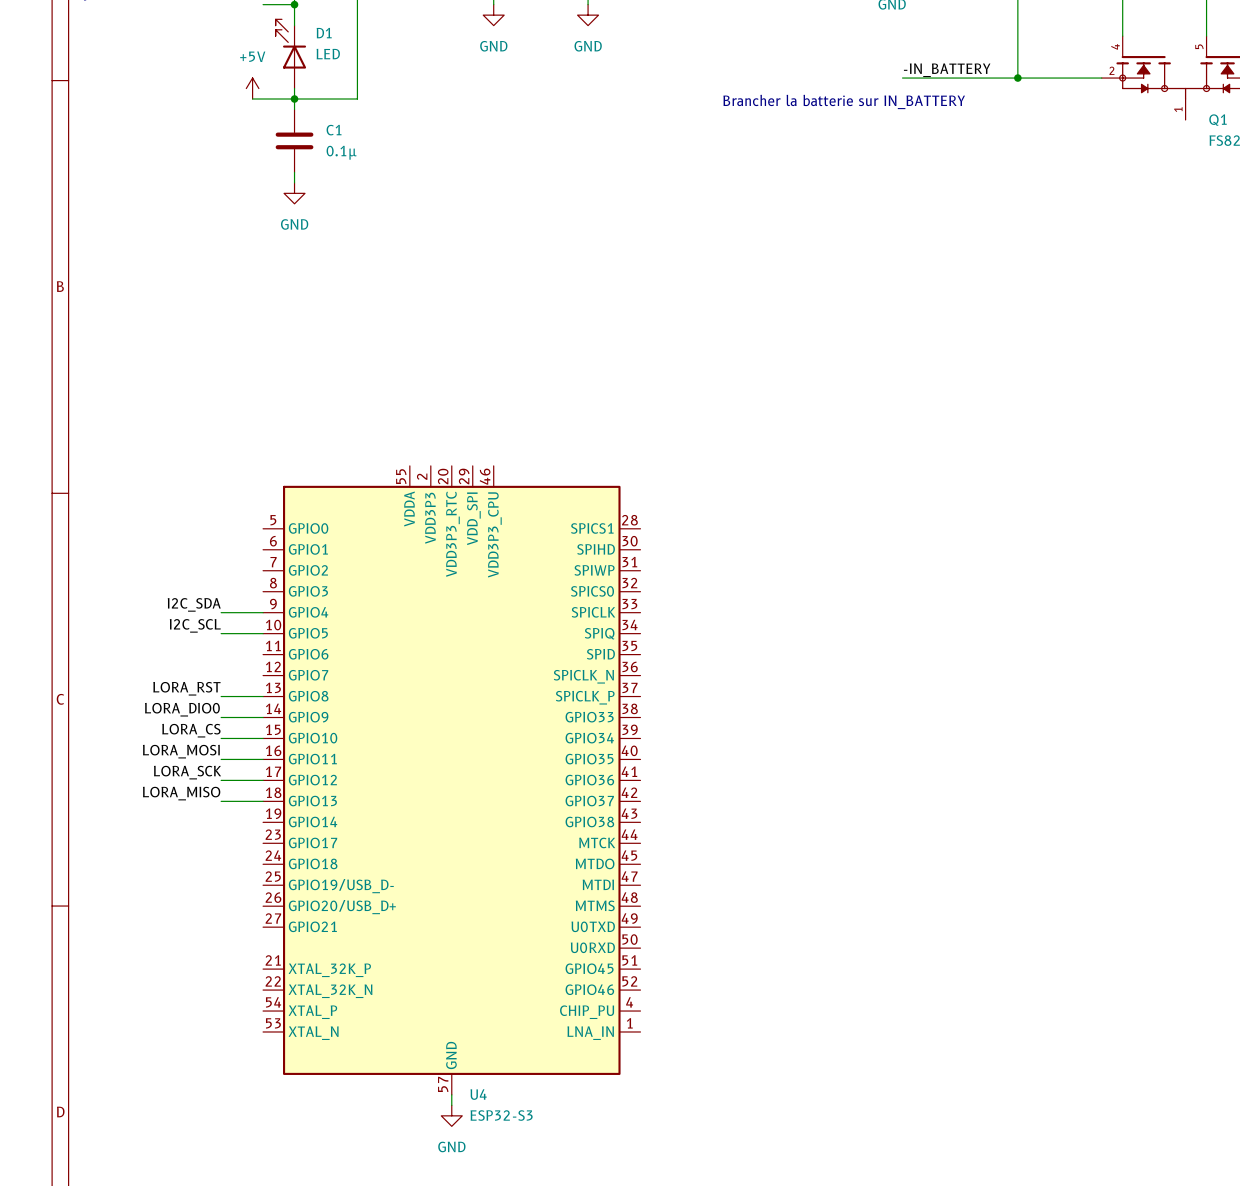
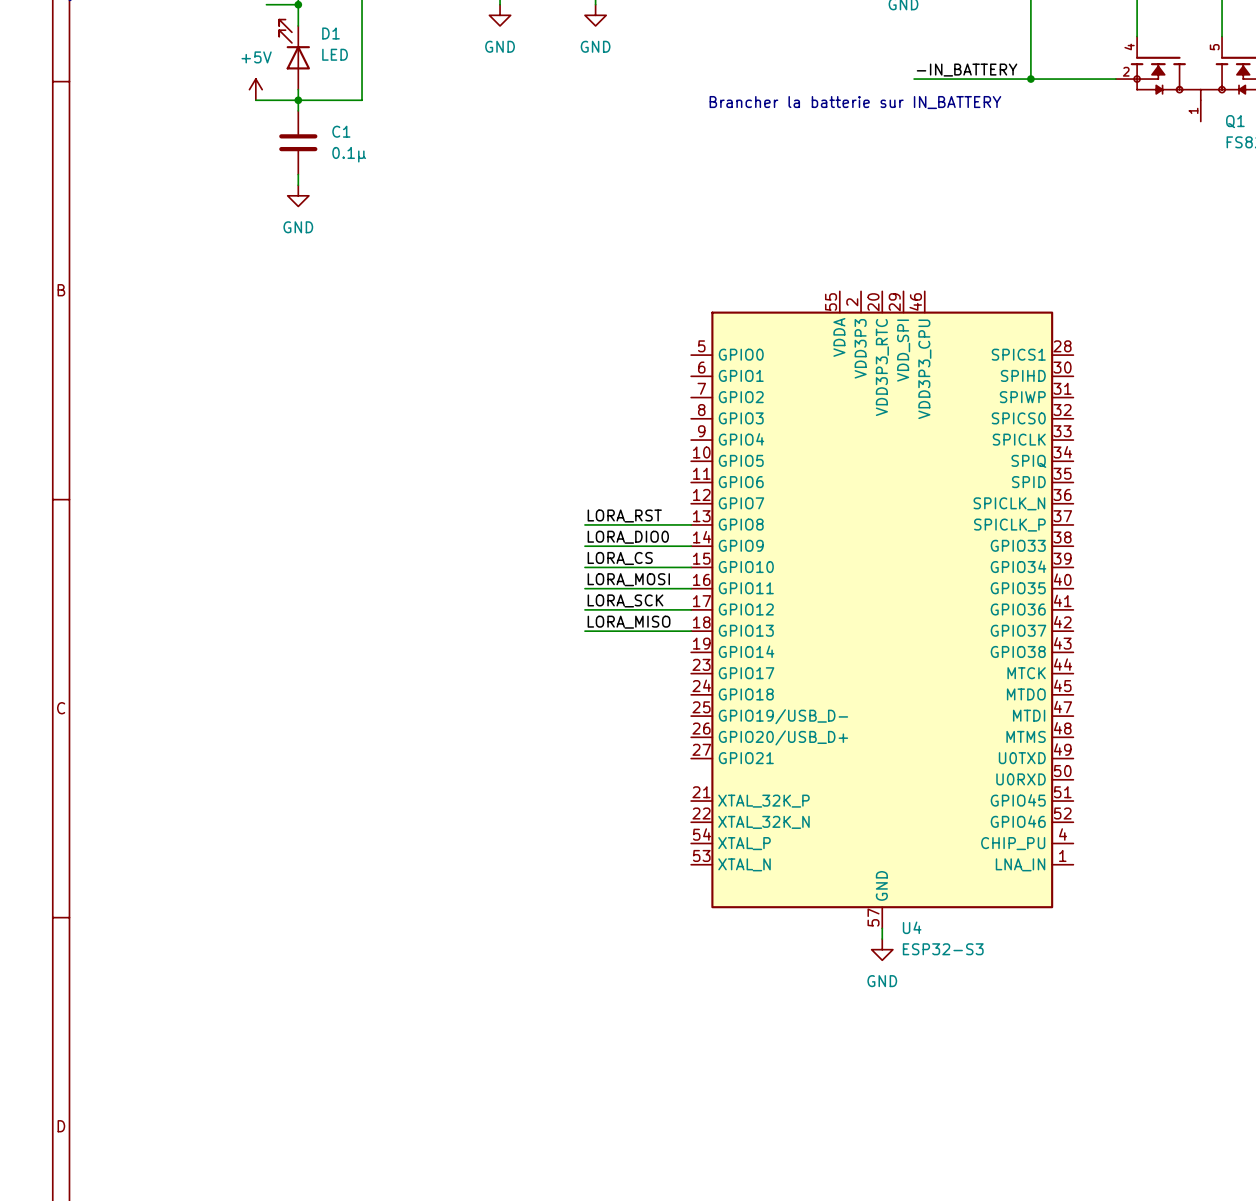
label: none -> LORA_RST (624, 516)
wire: none -> (584, 524) (691, 524)
label: none -> LORA_DIO0 (628, 537)
wire: none -> (584, 546) (691, 546)
label: none -> LORA_CS (620, 558)
wire: none -> (584, 567) (691, 567)
label: none -> LORA_MOSI (628, 579)
wire: none -> (584, 588) (691, 588)
label: none -> LORA_SCK (625, 600)
wire: none -> (584, 609) (691, 609)
label: I2C_SDA (194, 604) -> none
wire: (221, 612) (263, 612) -> none
label: none -> LORA_MISO (629, 622)
wire: none -> (584, 631) (691, 631)
label: I2C_SCL (195, 625) -> none
wire: (221, 633) (263, 633) -> none
label: LORA_RST (186, 688) -> none
wire: (221, 696) (263, 696) -> none
label: LORA_DIO0 (182, 709) -> none
wire: (221, 717) (263, 717) -> none
label: LORA_CS (191, 730) -> none
wire: (221, 738) (263, 738) -> none
label: LORA_MOSI (181, 751) -> none
wire: (221, 759) (263, 759) -> none
label: LORA_SCK (187, 772) -> none
wire: (221, 780) (263, 780) -> none
U4 position: (451, 780) -> (882, 609)
label: LORA_MISO (181, 793) -> none
wire: (221, 801) (263, 801) -> none
wire: none -> (882, 928) (882, 939)
power symbol: none -> GND (882, 949)
wire: (451, 1094) (451, 1105) -> none
power symbol: GND (451, 1115) -> none

